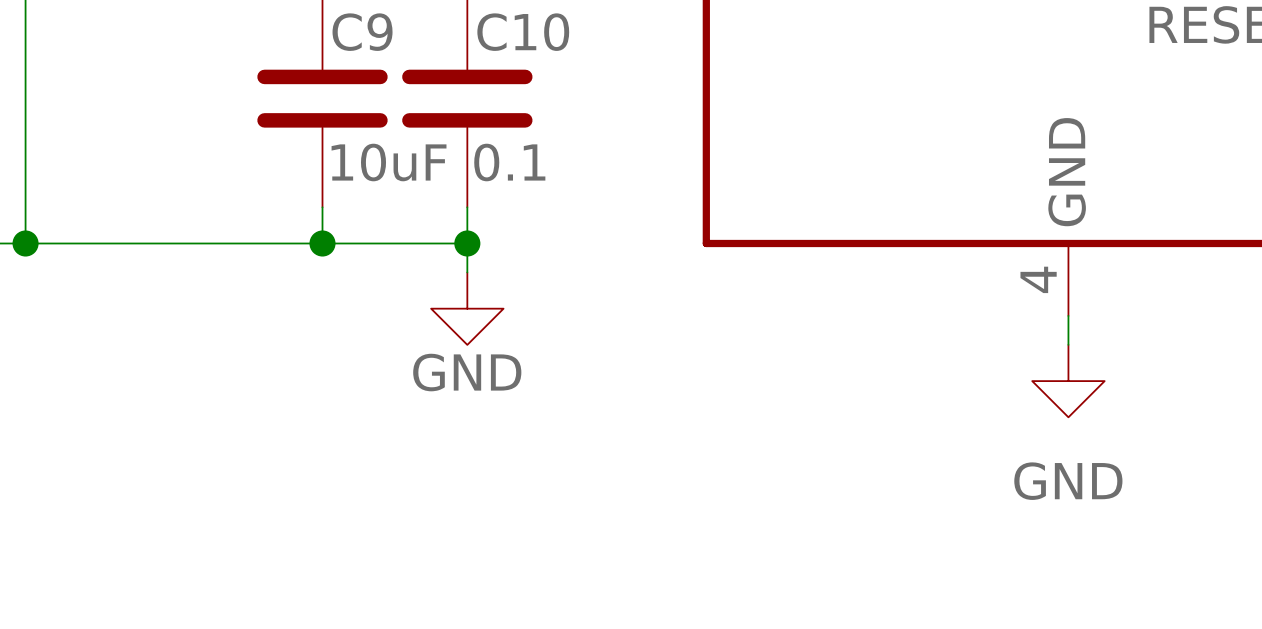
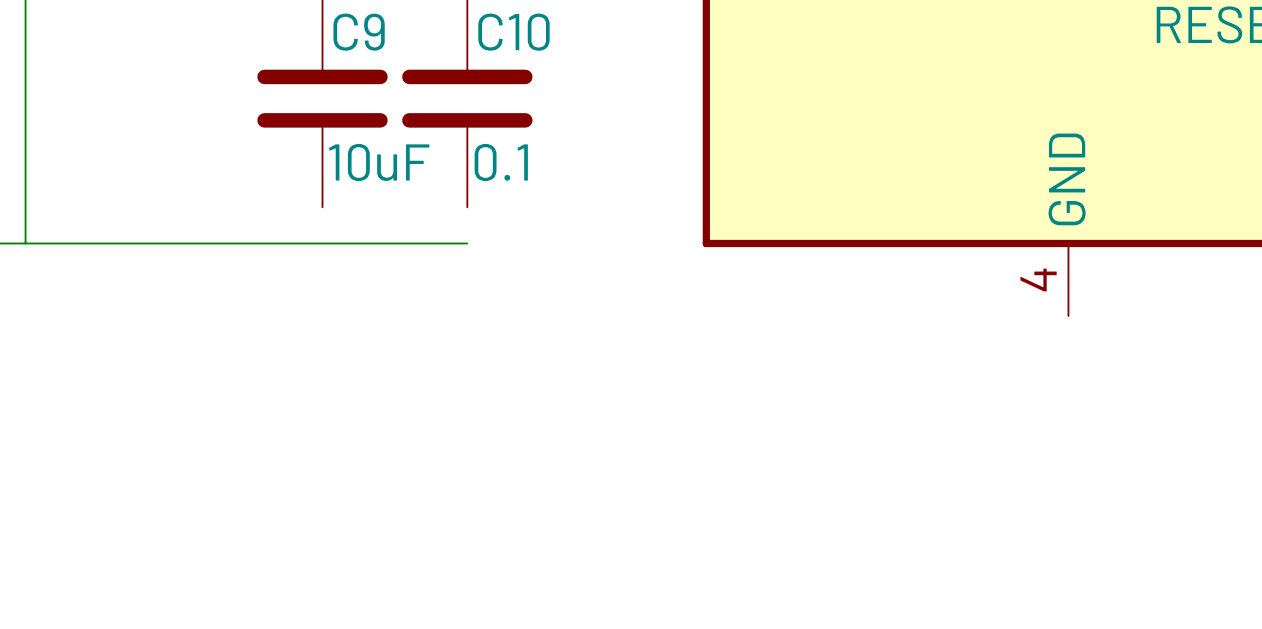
wire: (322, 207) (322, 243) -> none
wire: (467, 207) (467, 272) -> none
junction: (25, 243) -> none
junction: (322, 243) -> none
junction: (467, 243) -> none
power symbol: GND (467, 308) -> none
wire: (1068, 315) (1068, 344) -> none
power symbol: GND (1068, 381) -> none

